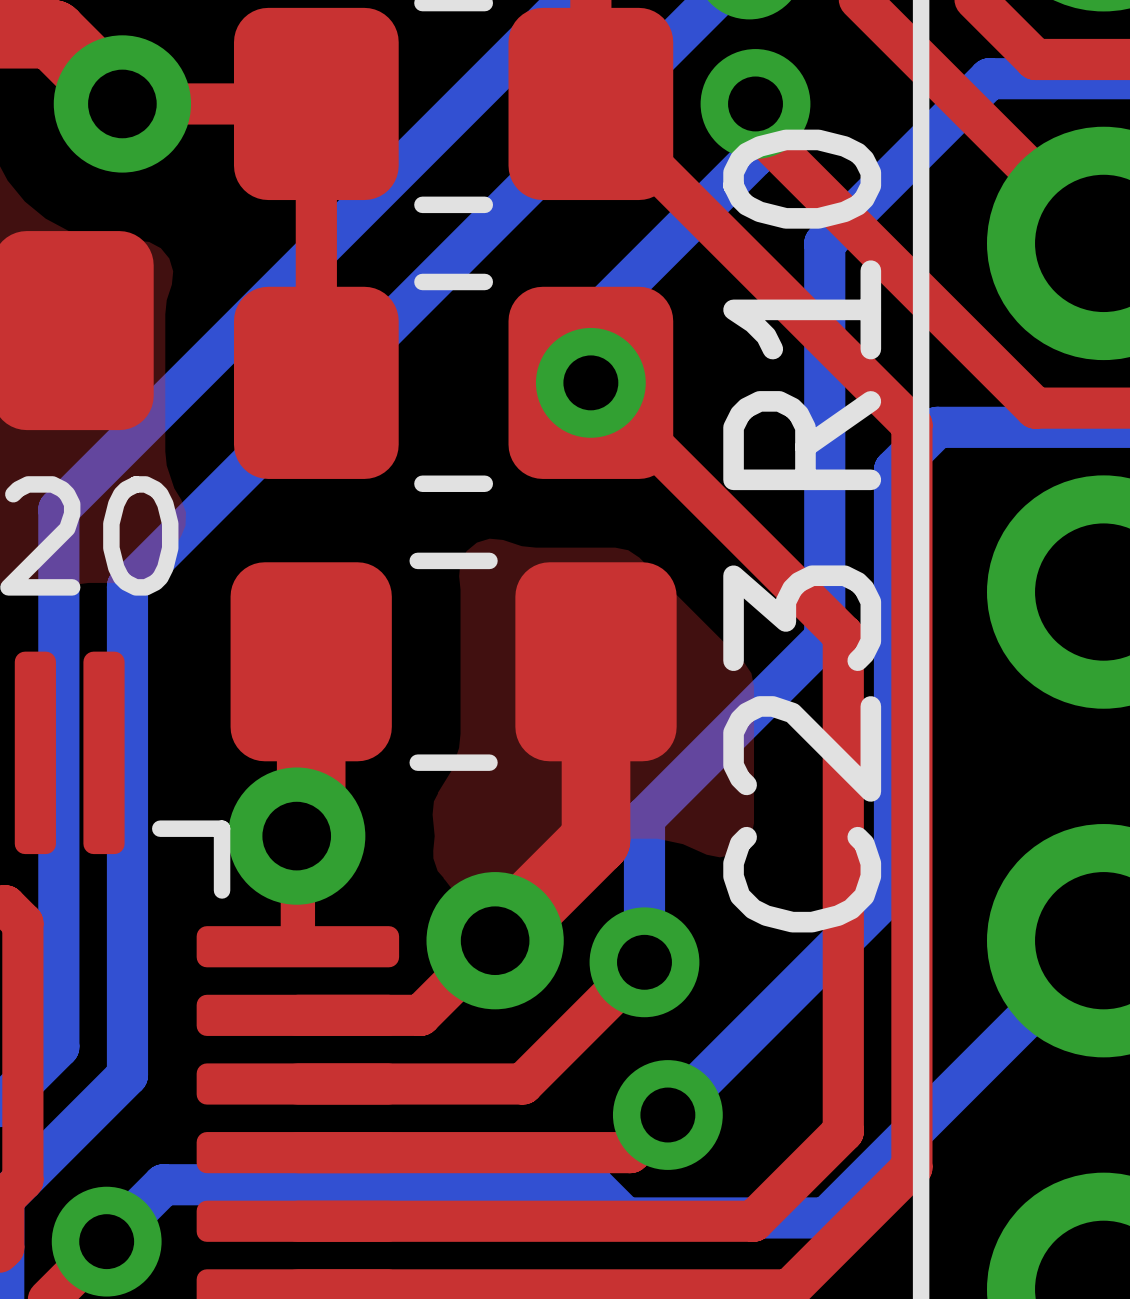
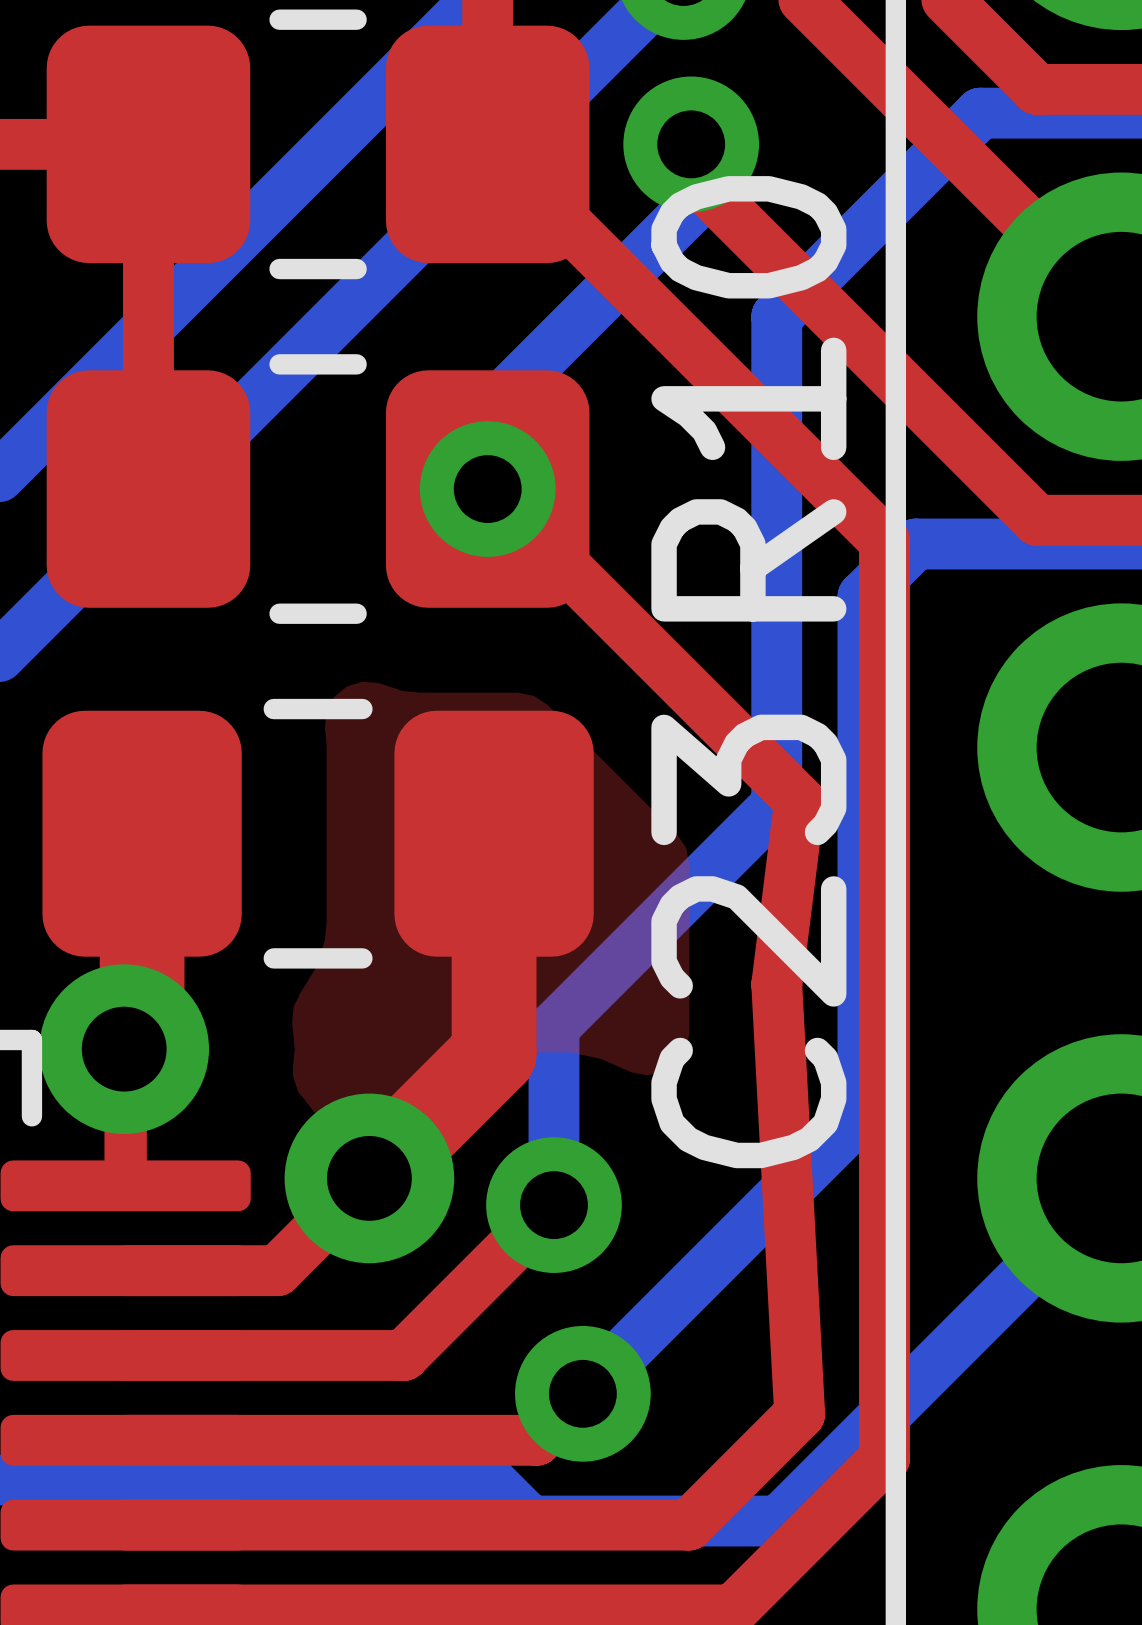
top track: (843, 635) (843, 1131) -> (799, 800) (776, 984) (799, 1414)

